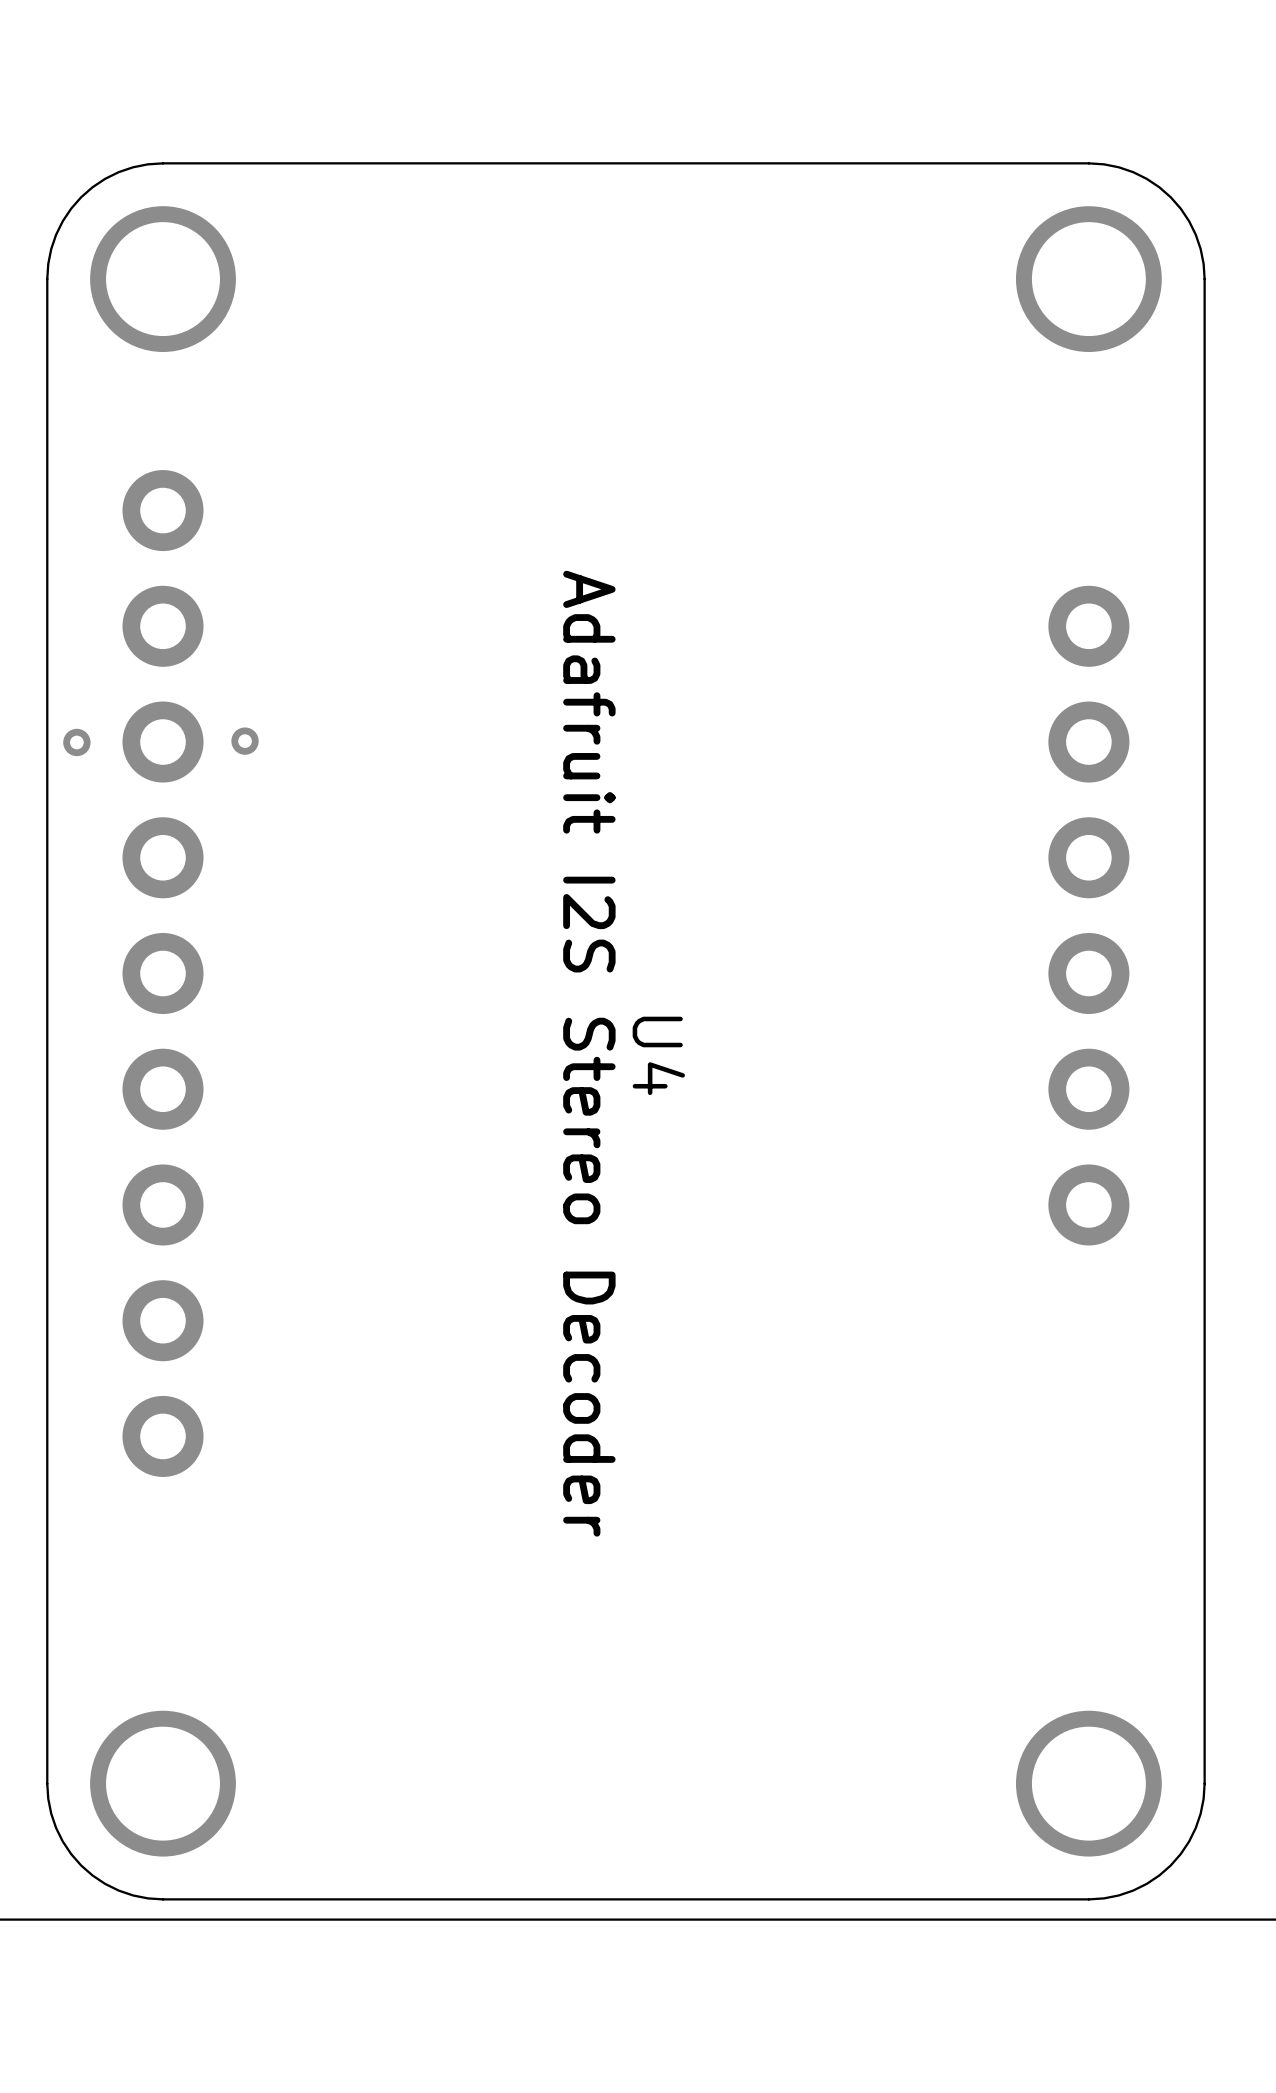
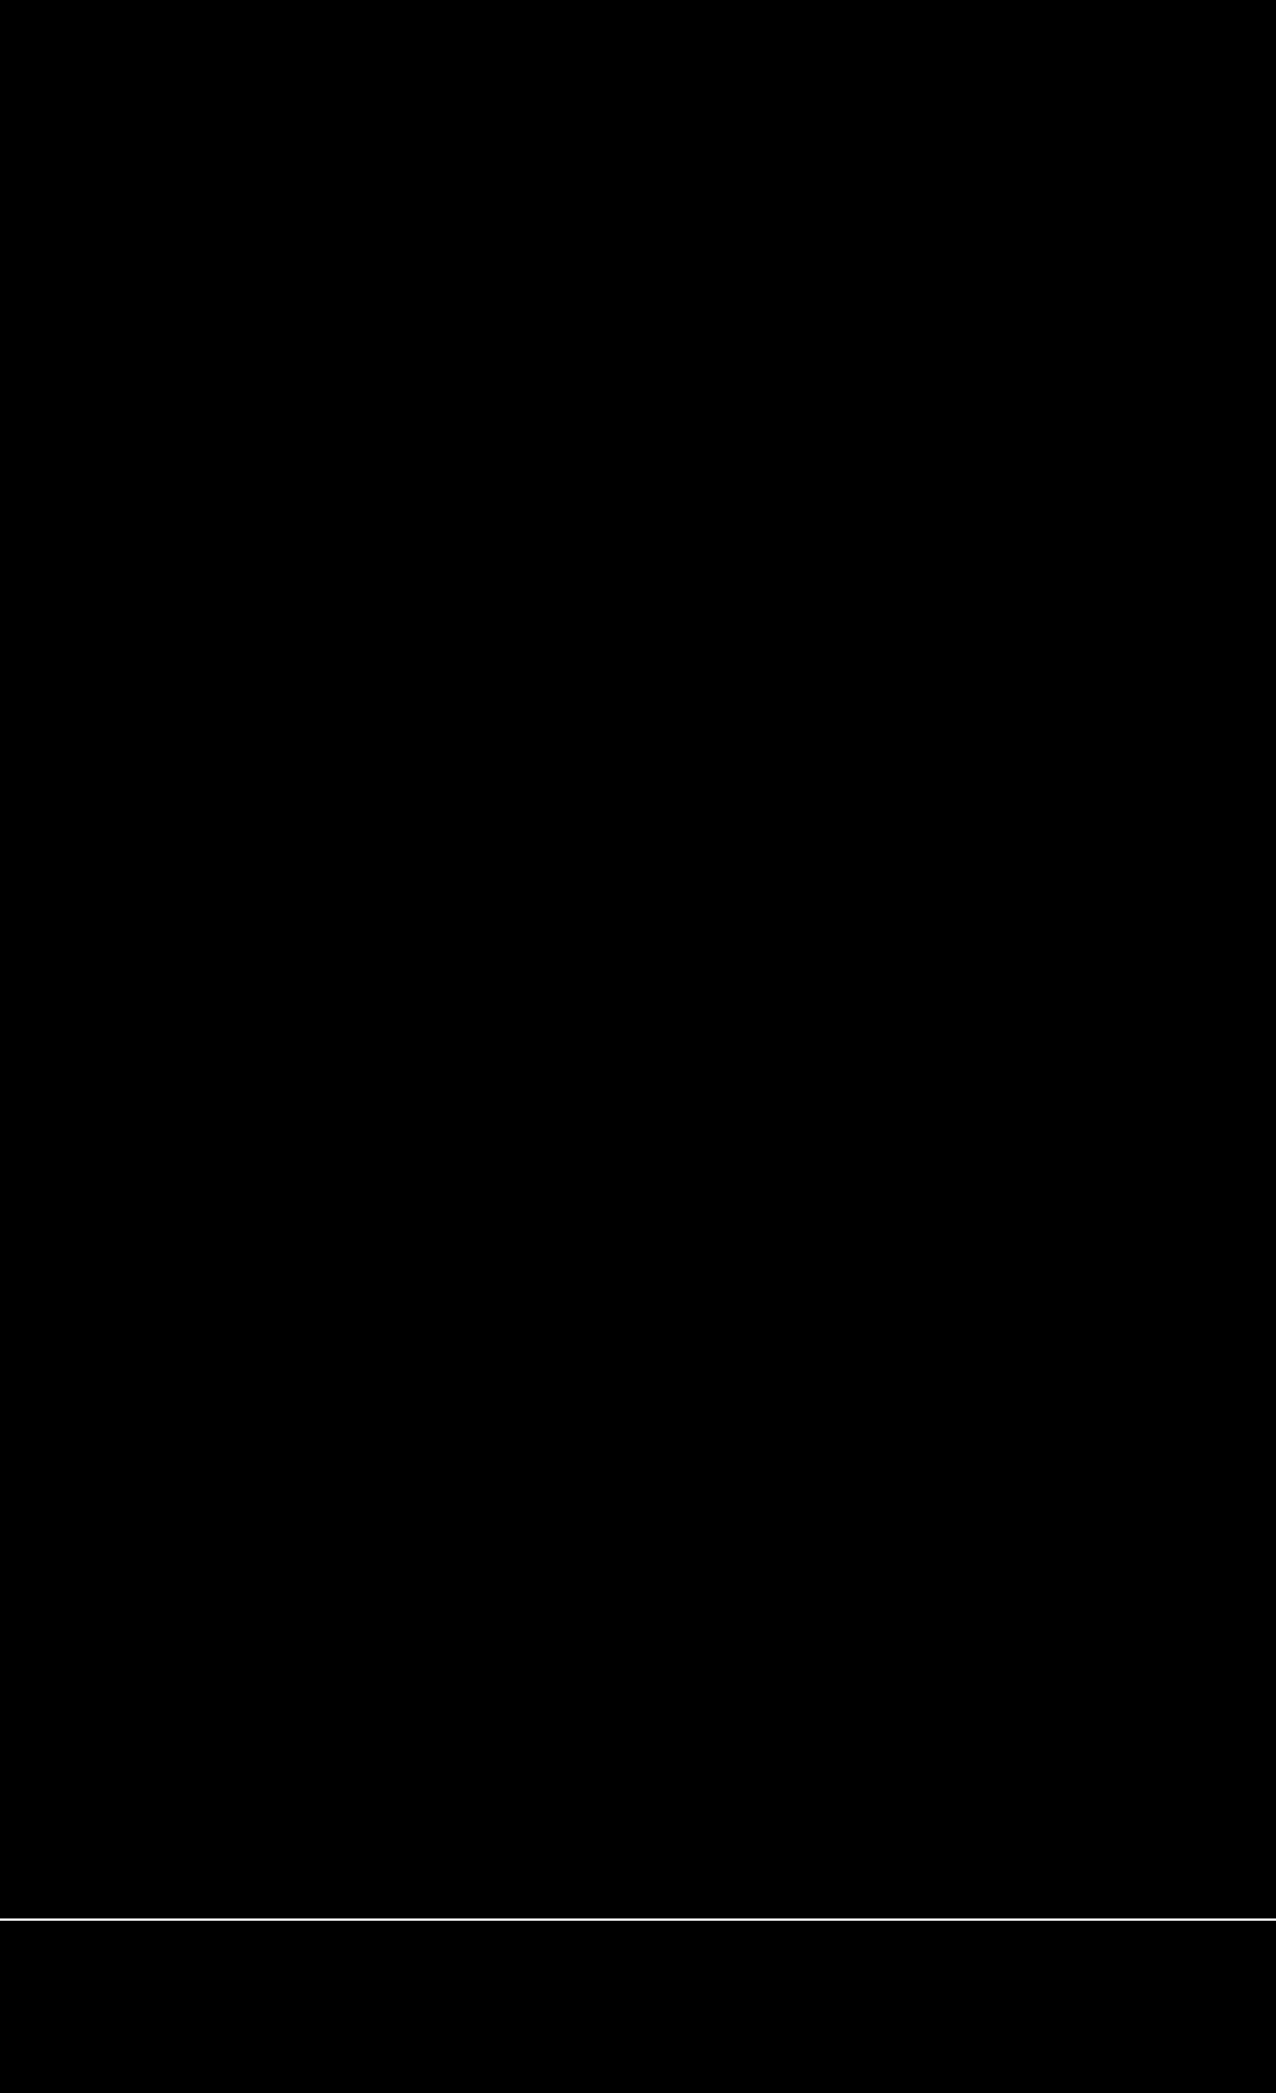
via: (245, 741) -> none
via: (76, 742) -> none
U4: Adafruit I2S Stereo Decoder (625, 1031) -> none

